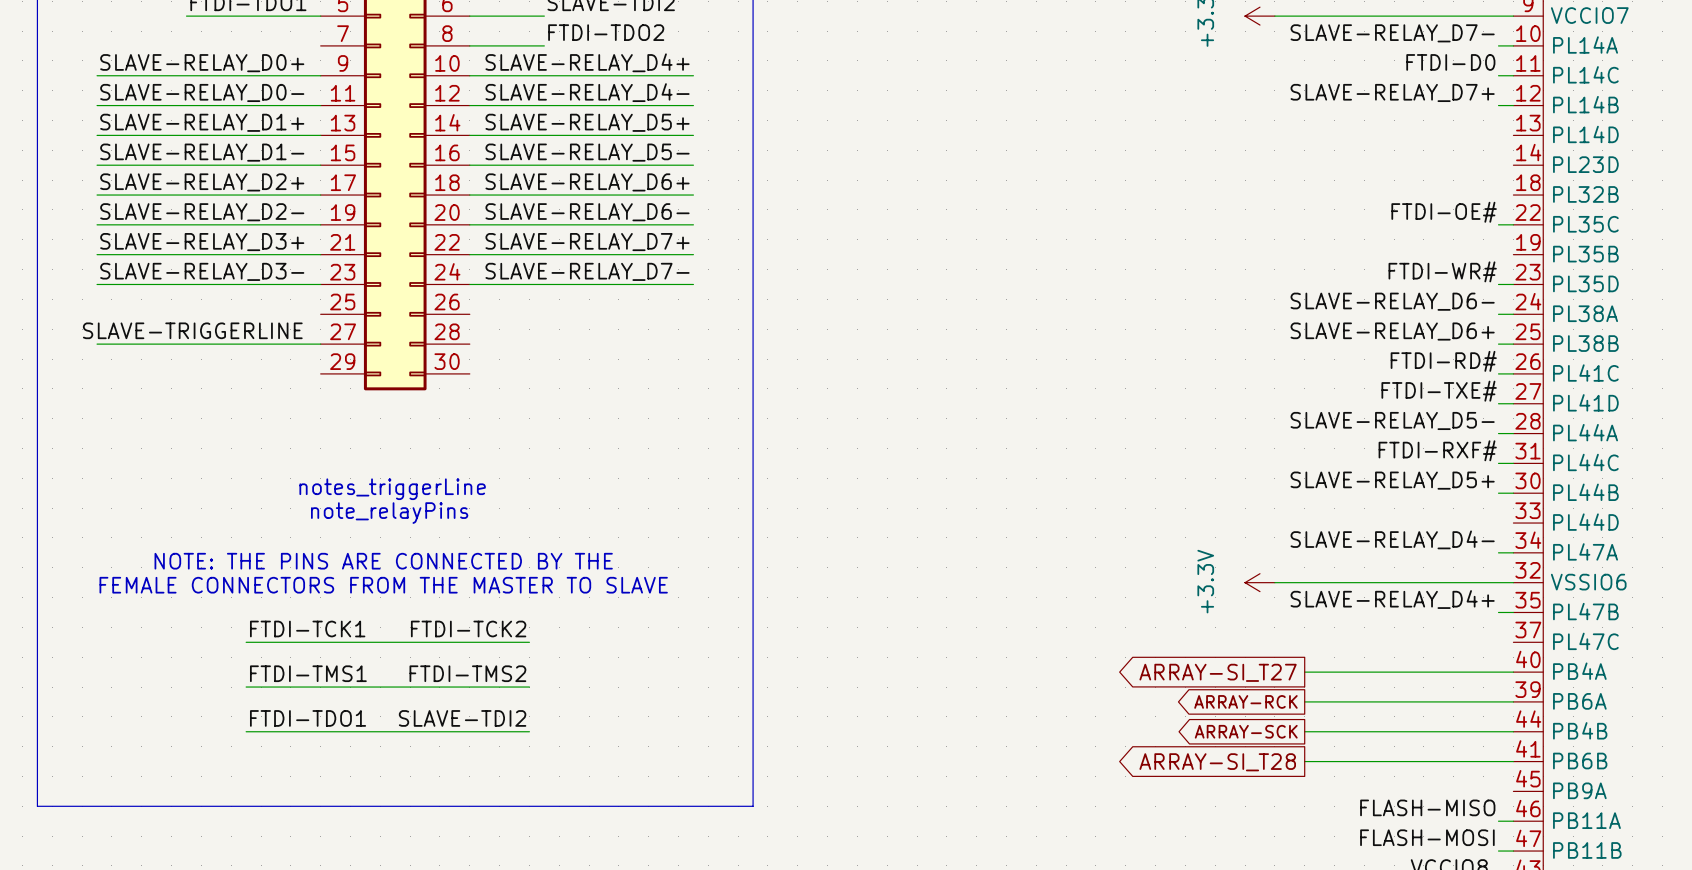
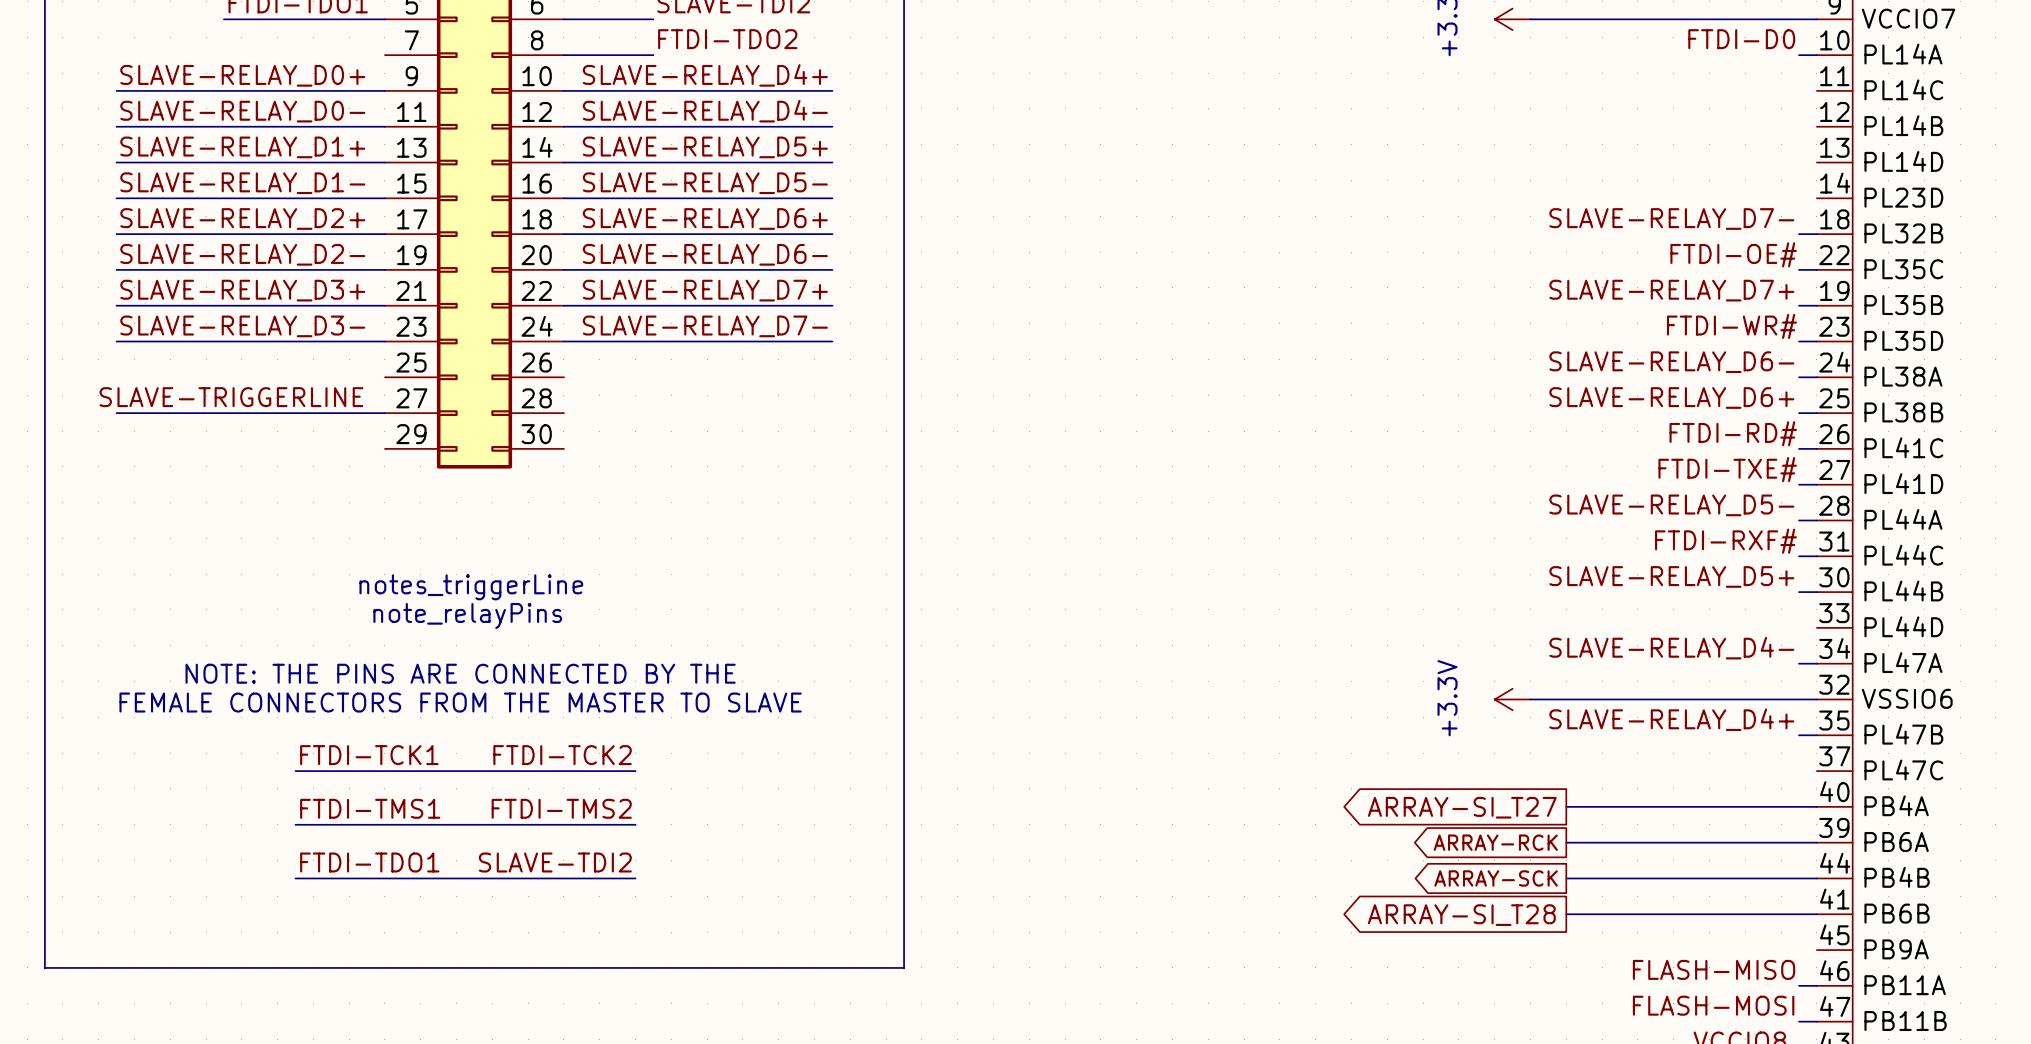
label: SLAVE-RELAY_D7- (1392, 33) -> FTDI-D0 (1741, 39)
label: FTDI-D0 (1450, 62) -> none
wire: (1498, 75) (1513, 75) -> (1798, 305) (1816, 305)
label position: SLAVE-RELAY_D7+ (1392, 92) -> SLAVE-RELAY_D7+ (1671, 290)
wire: (1498, 105) (1513, 105) -> (1798, 234) (1816, 234)
label: none -> SLAVE-RELAY_D7- (1671, 219)

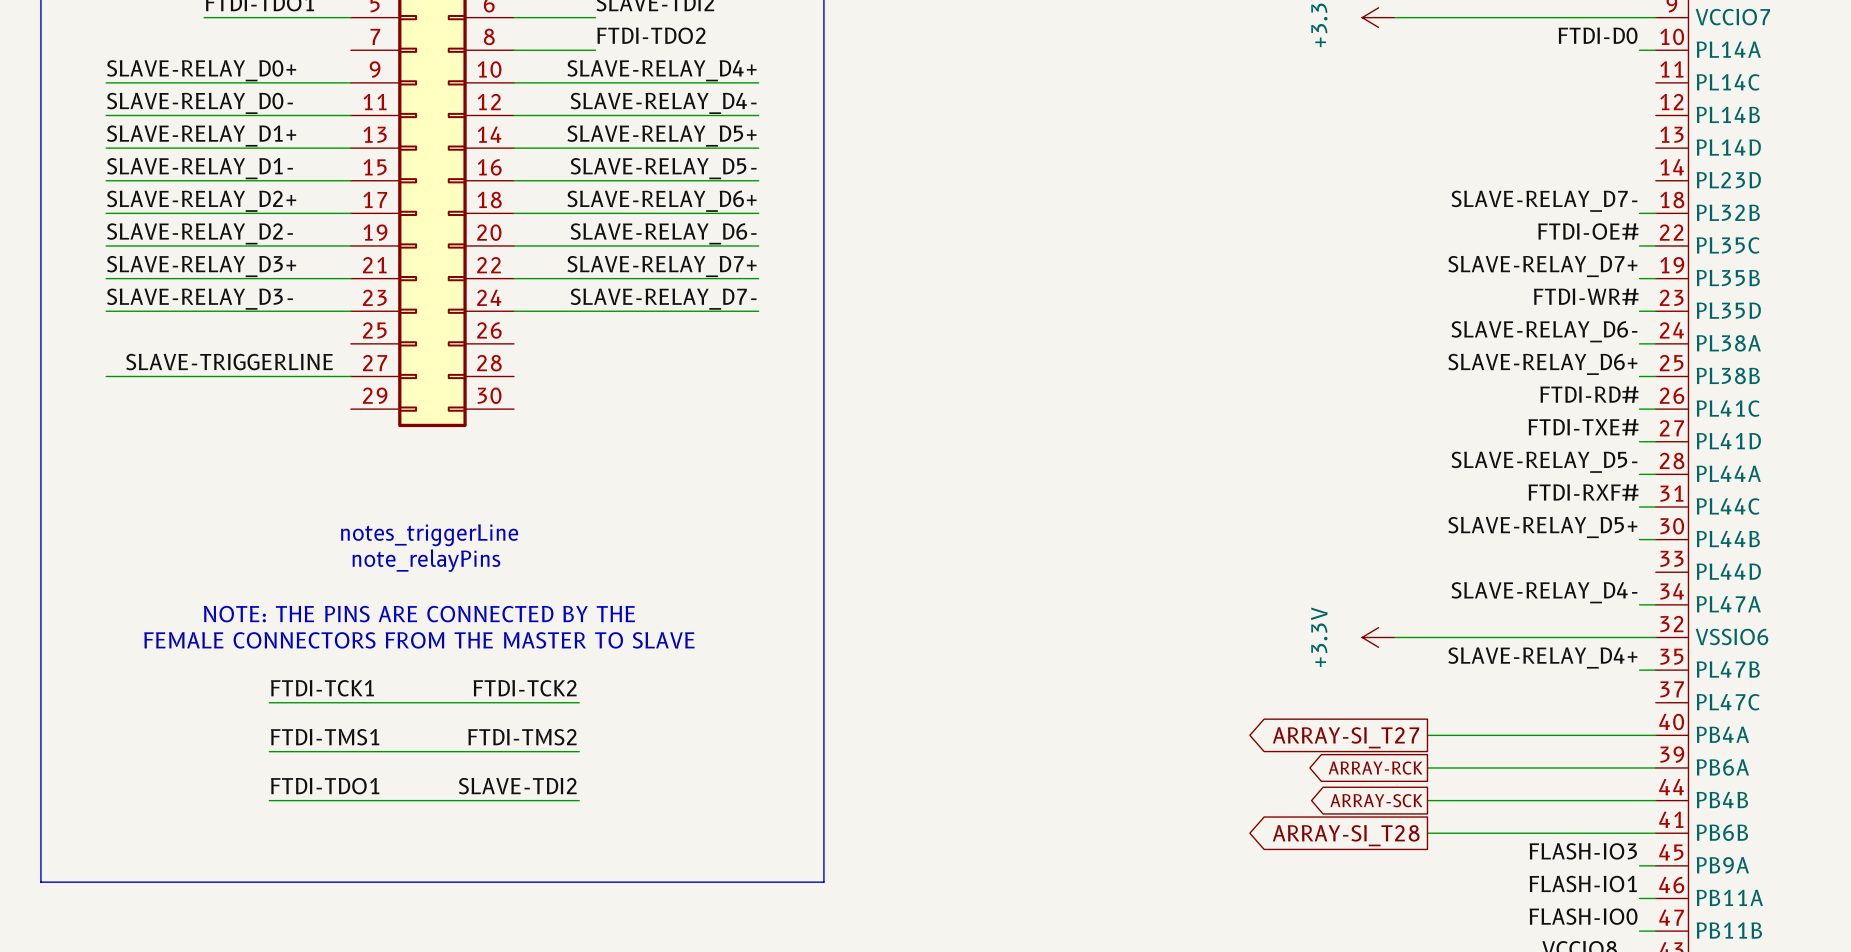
label: none -> FLASH-IO3 (1583, 851)
wire: none -> (1639, 865) (1655, 865)
label: FLASH-MISO (1714, 969) -> FLASH-IO1 (1583, 884)
label: FLASH-MOSI (1713, 1005) -> FLASH-IO0 (1583, 916)

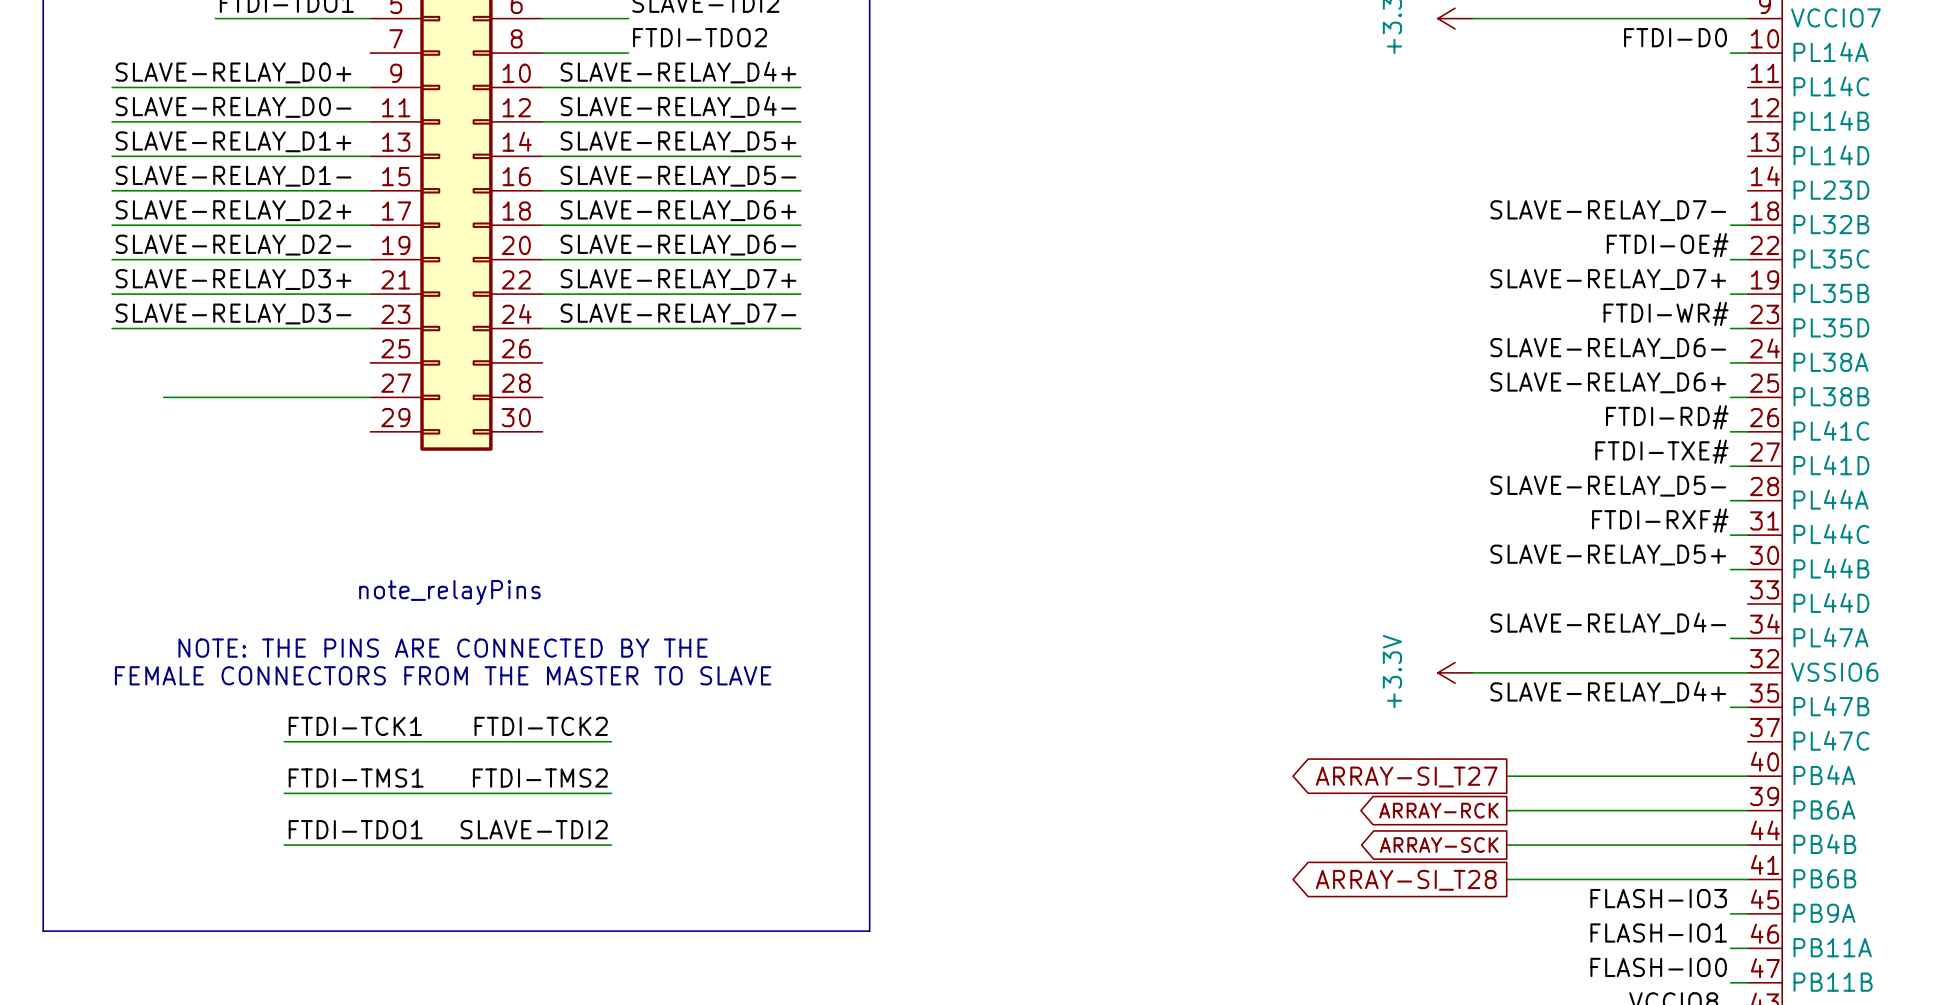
label: SLAVE-TRIGGERLINE (229, 362) -> none
wire: (106, 376) (155, 376) -> none
text: notes_triggerLine (429, 535) -> none

